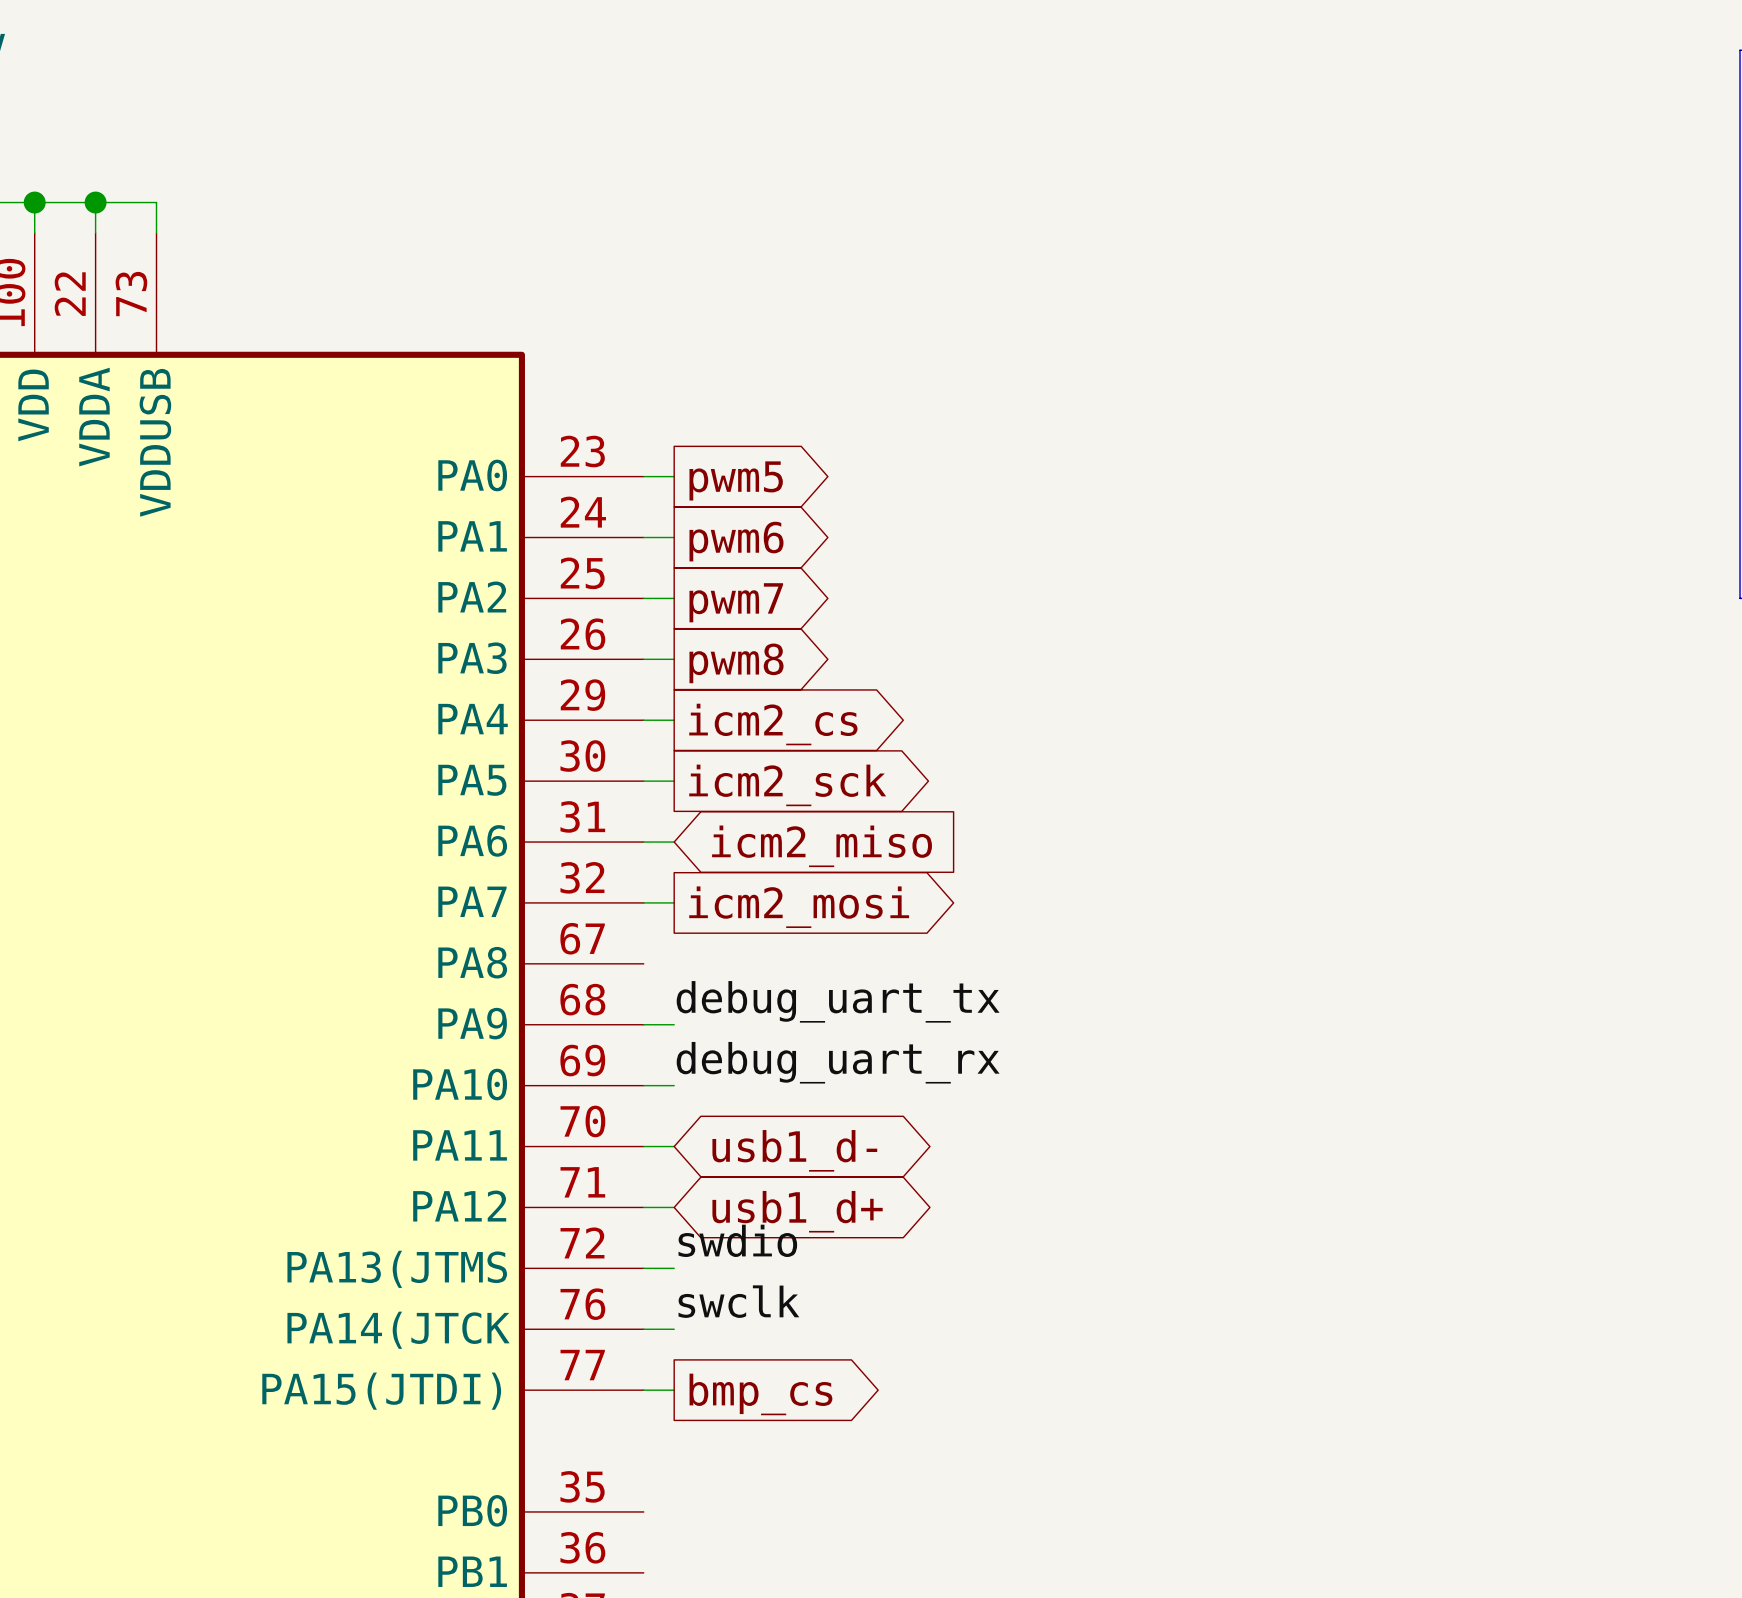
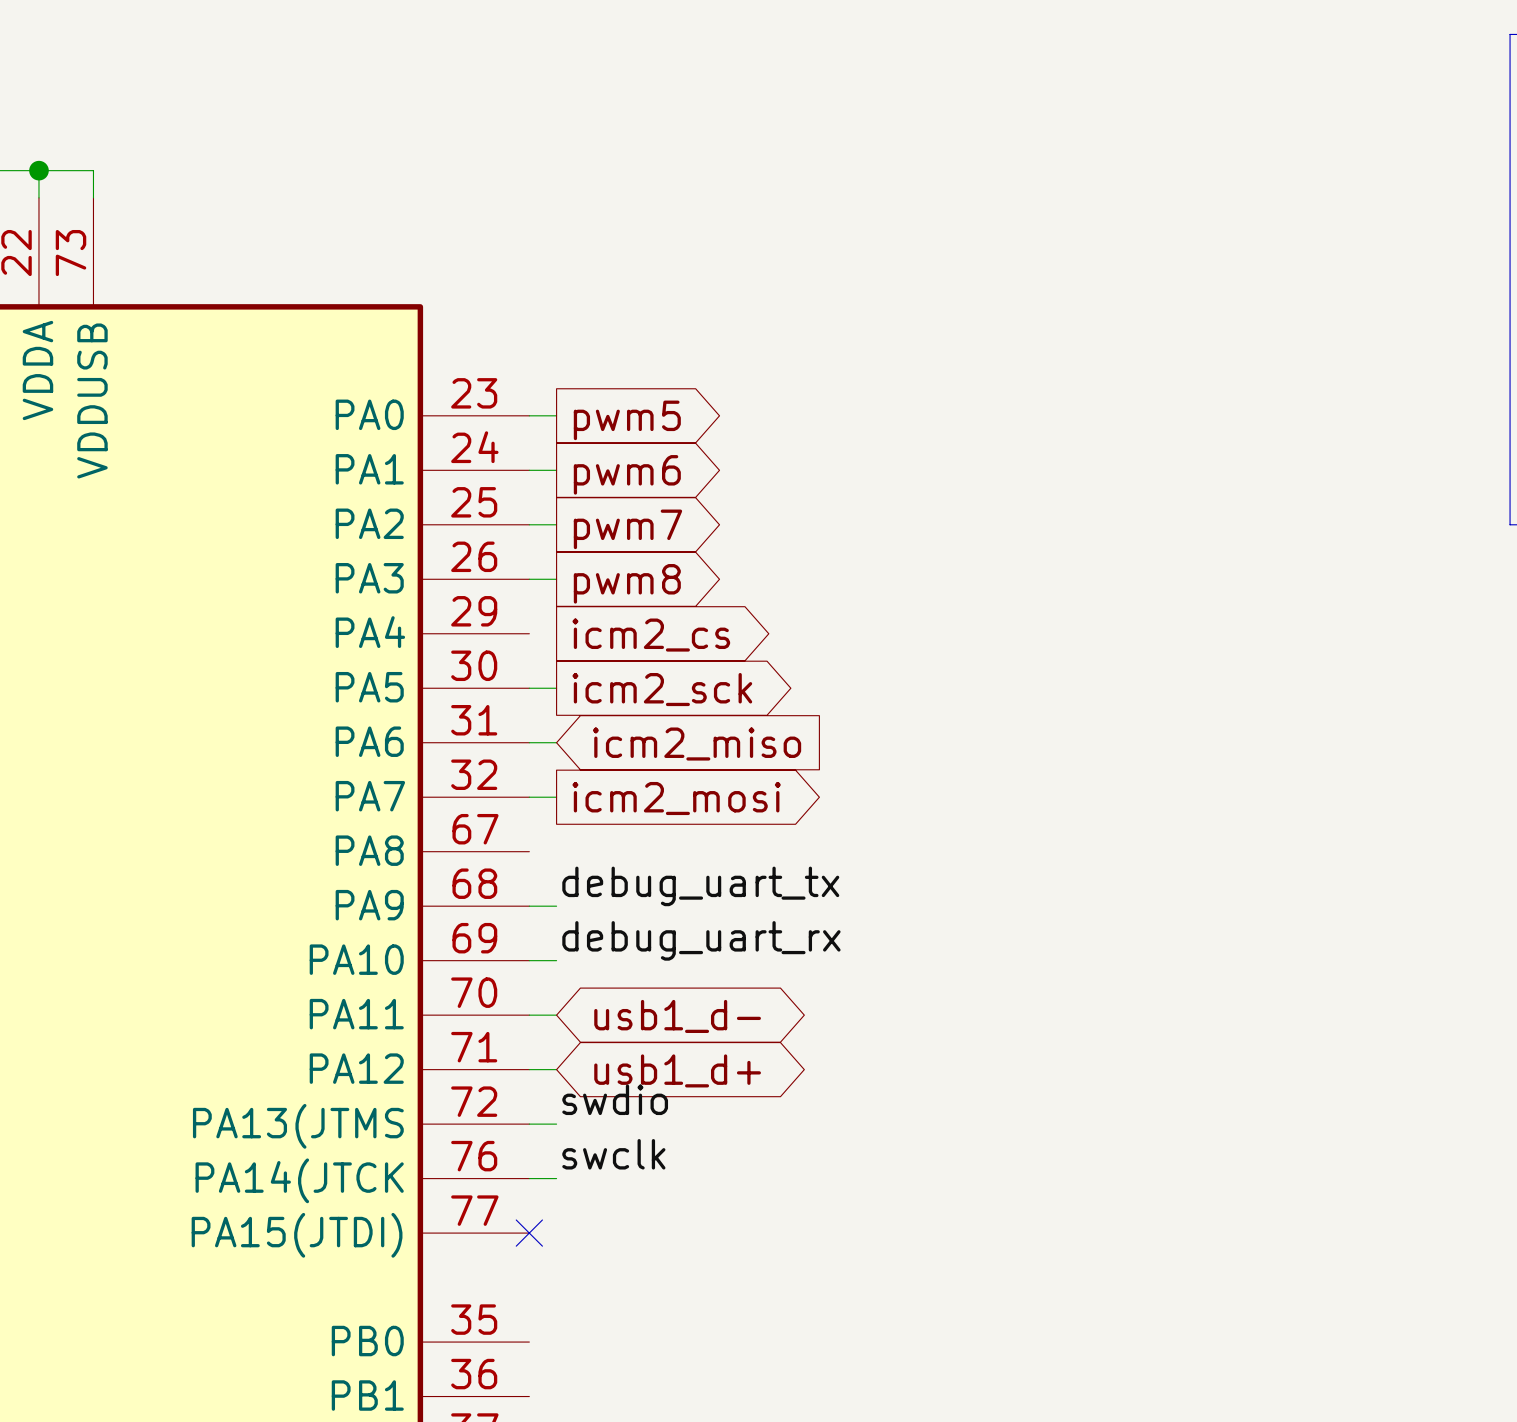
wire: (643, 720) (674, 720) -> none
wire: (643, 1390) (674, 1390) -> none
no-connect mark: none -> (529, 1233)
global label: bmp_cs (760, 1394) -> none

